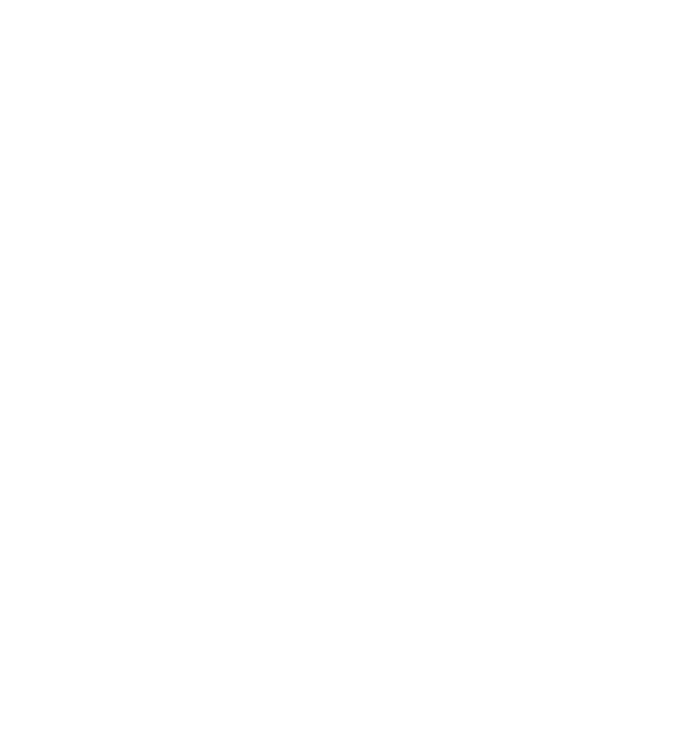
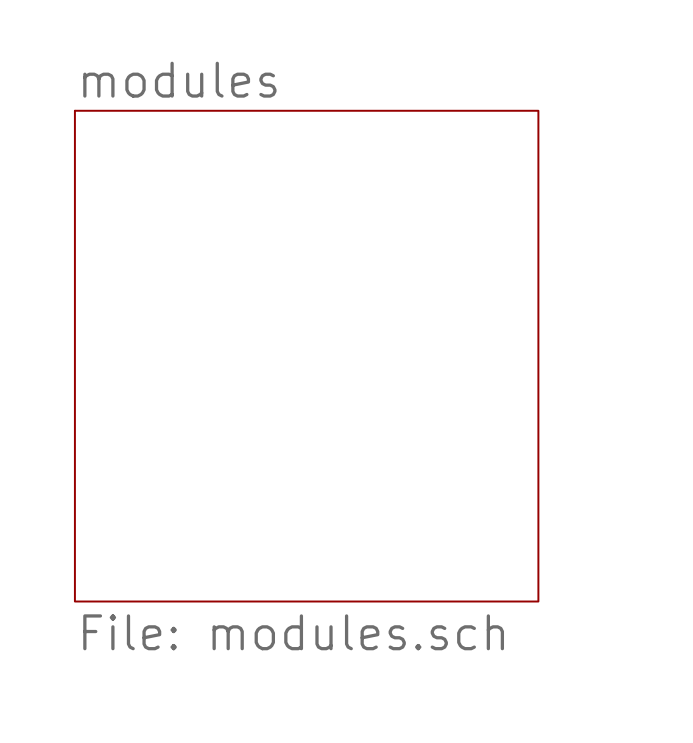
sheet modules: none -> File: modules.sch (306, 356)

